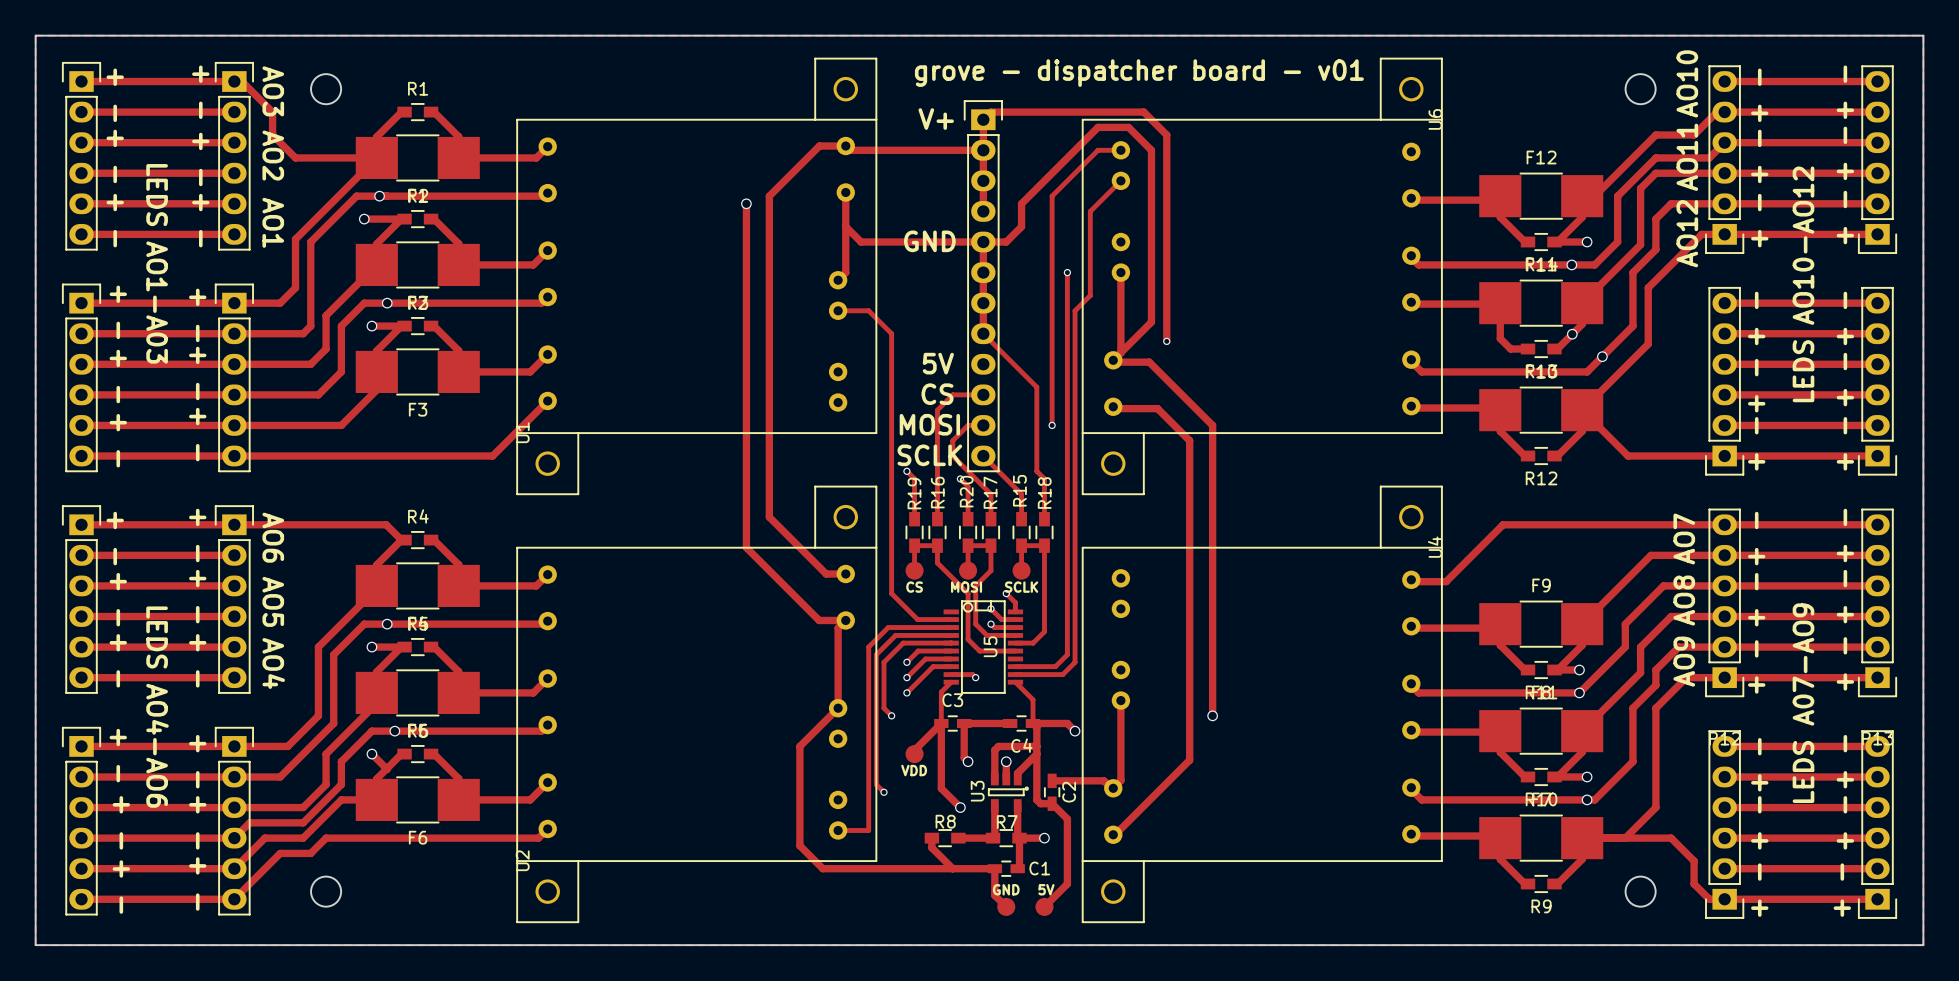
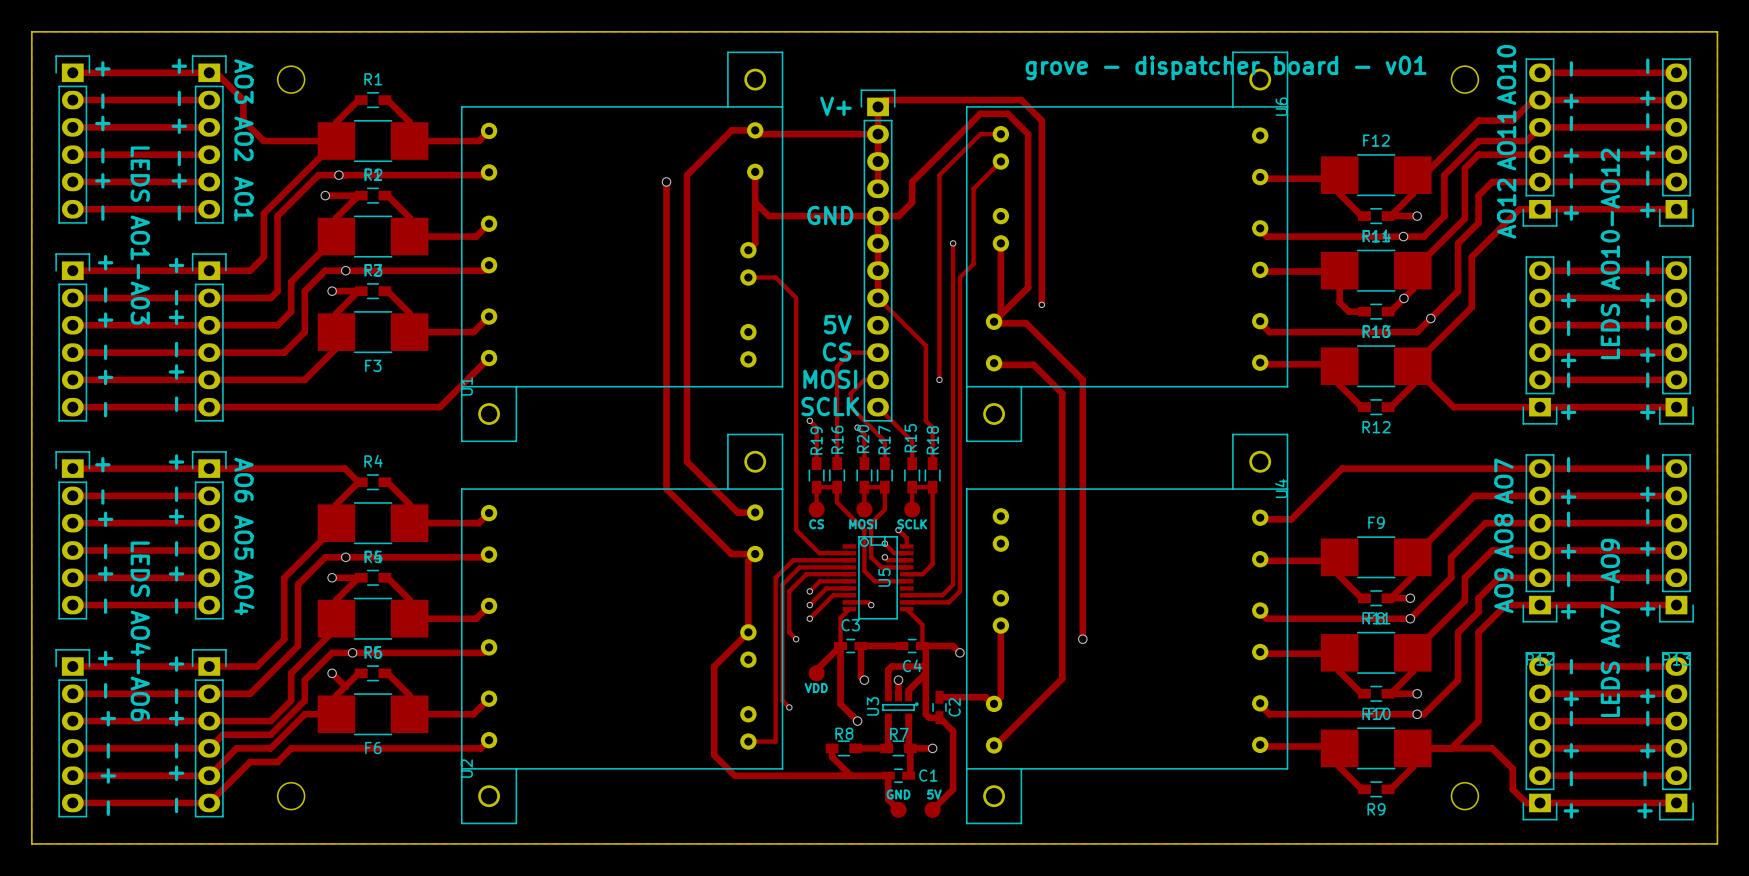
text position: grove - dispatcher board - v01 (1139, 73) -> grove - dispatcher board - v01 (1226, 68)

